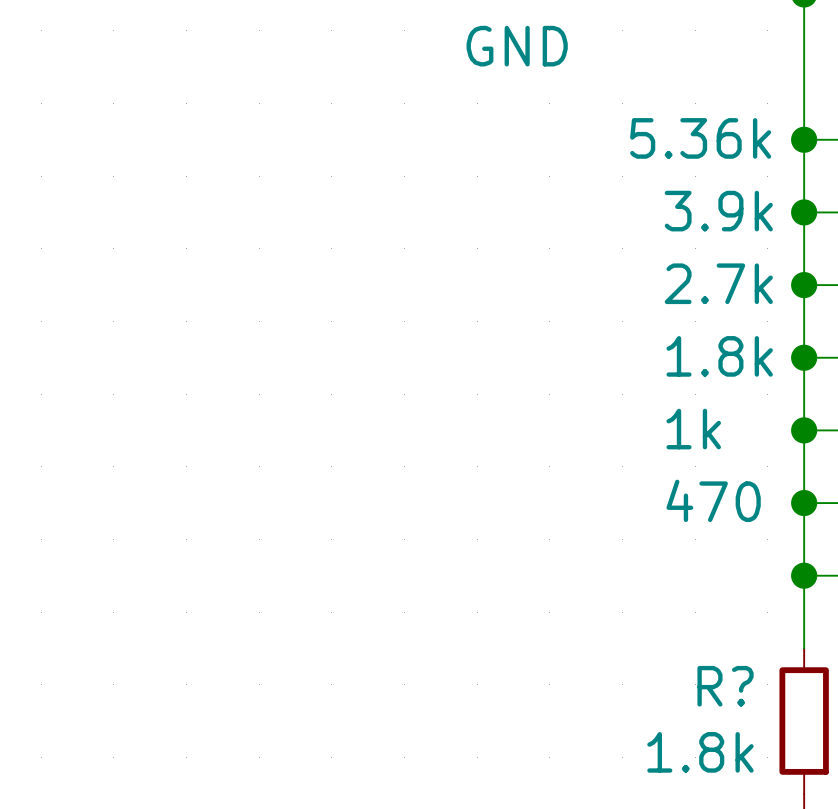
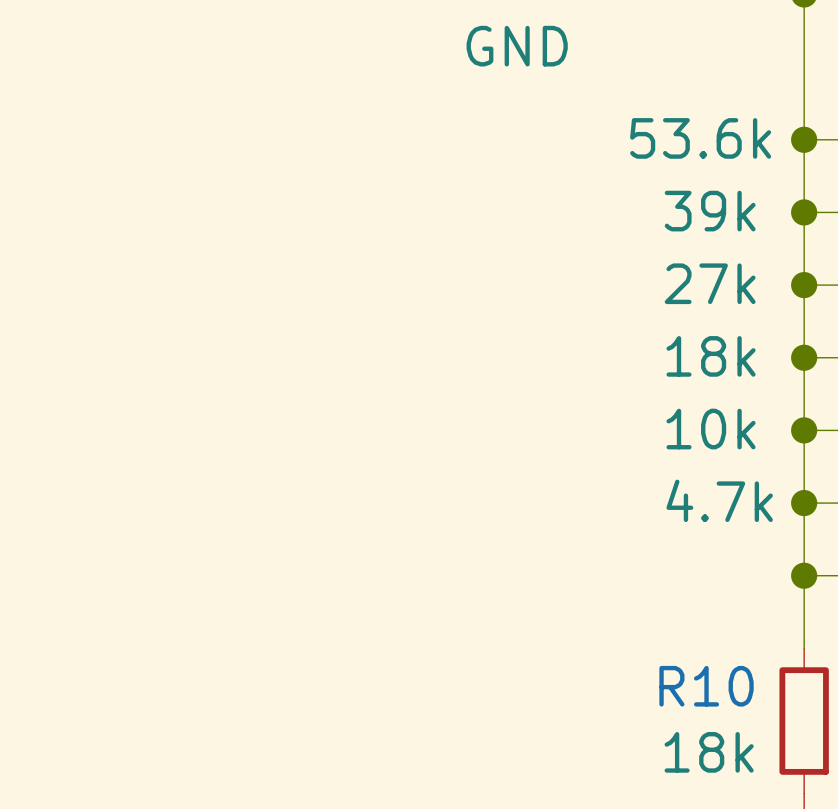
part value: 5.36k (700, 138) -> 53.6k (700, 138)
part value: 3.9k (718, 211) -> 39k (710, 211)
part value: 2.7k (718, 283) -> 27k (710, 283)
part value: 1.8k (719, 356) -> 18k (711, 356)
part value: 1k (693, 429) -> 10k (711, 429)
part value: 470 (713, 500) -> 4.7k (719, 500)
R? name: R? (725, 686) -> R10 (706, 686)
R? value: 1.8k (700, 752) -> 18k (709, 752)

